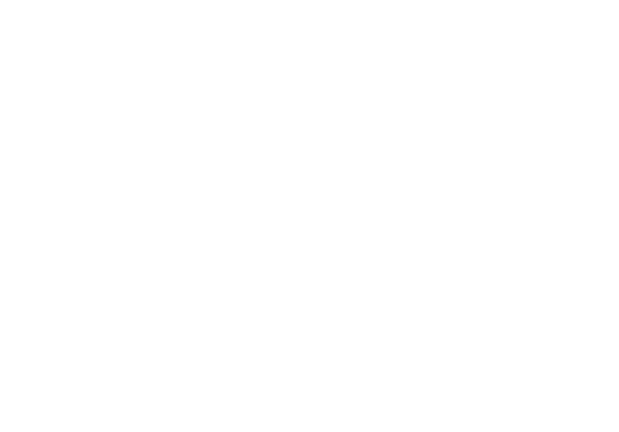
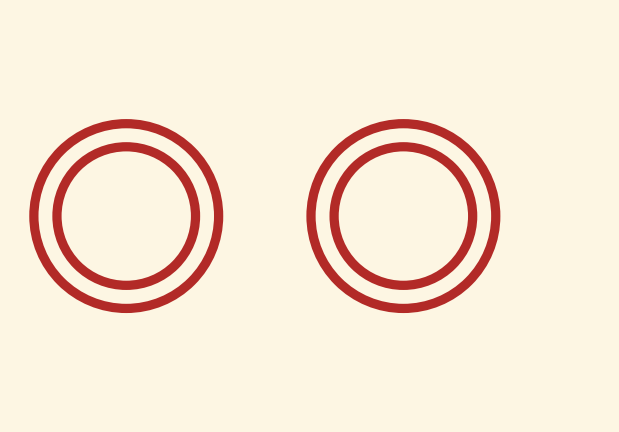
part: none -> (126, 216)
part: none -> (403, 216)

